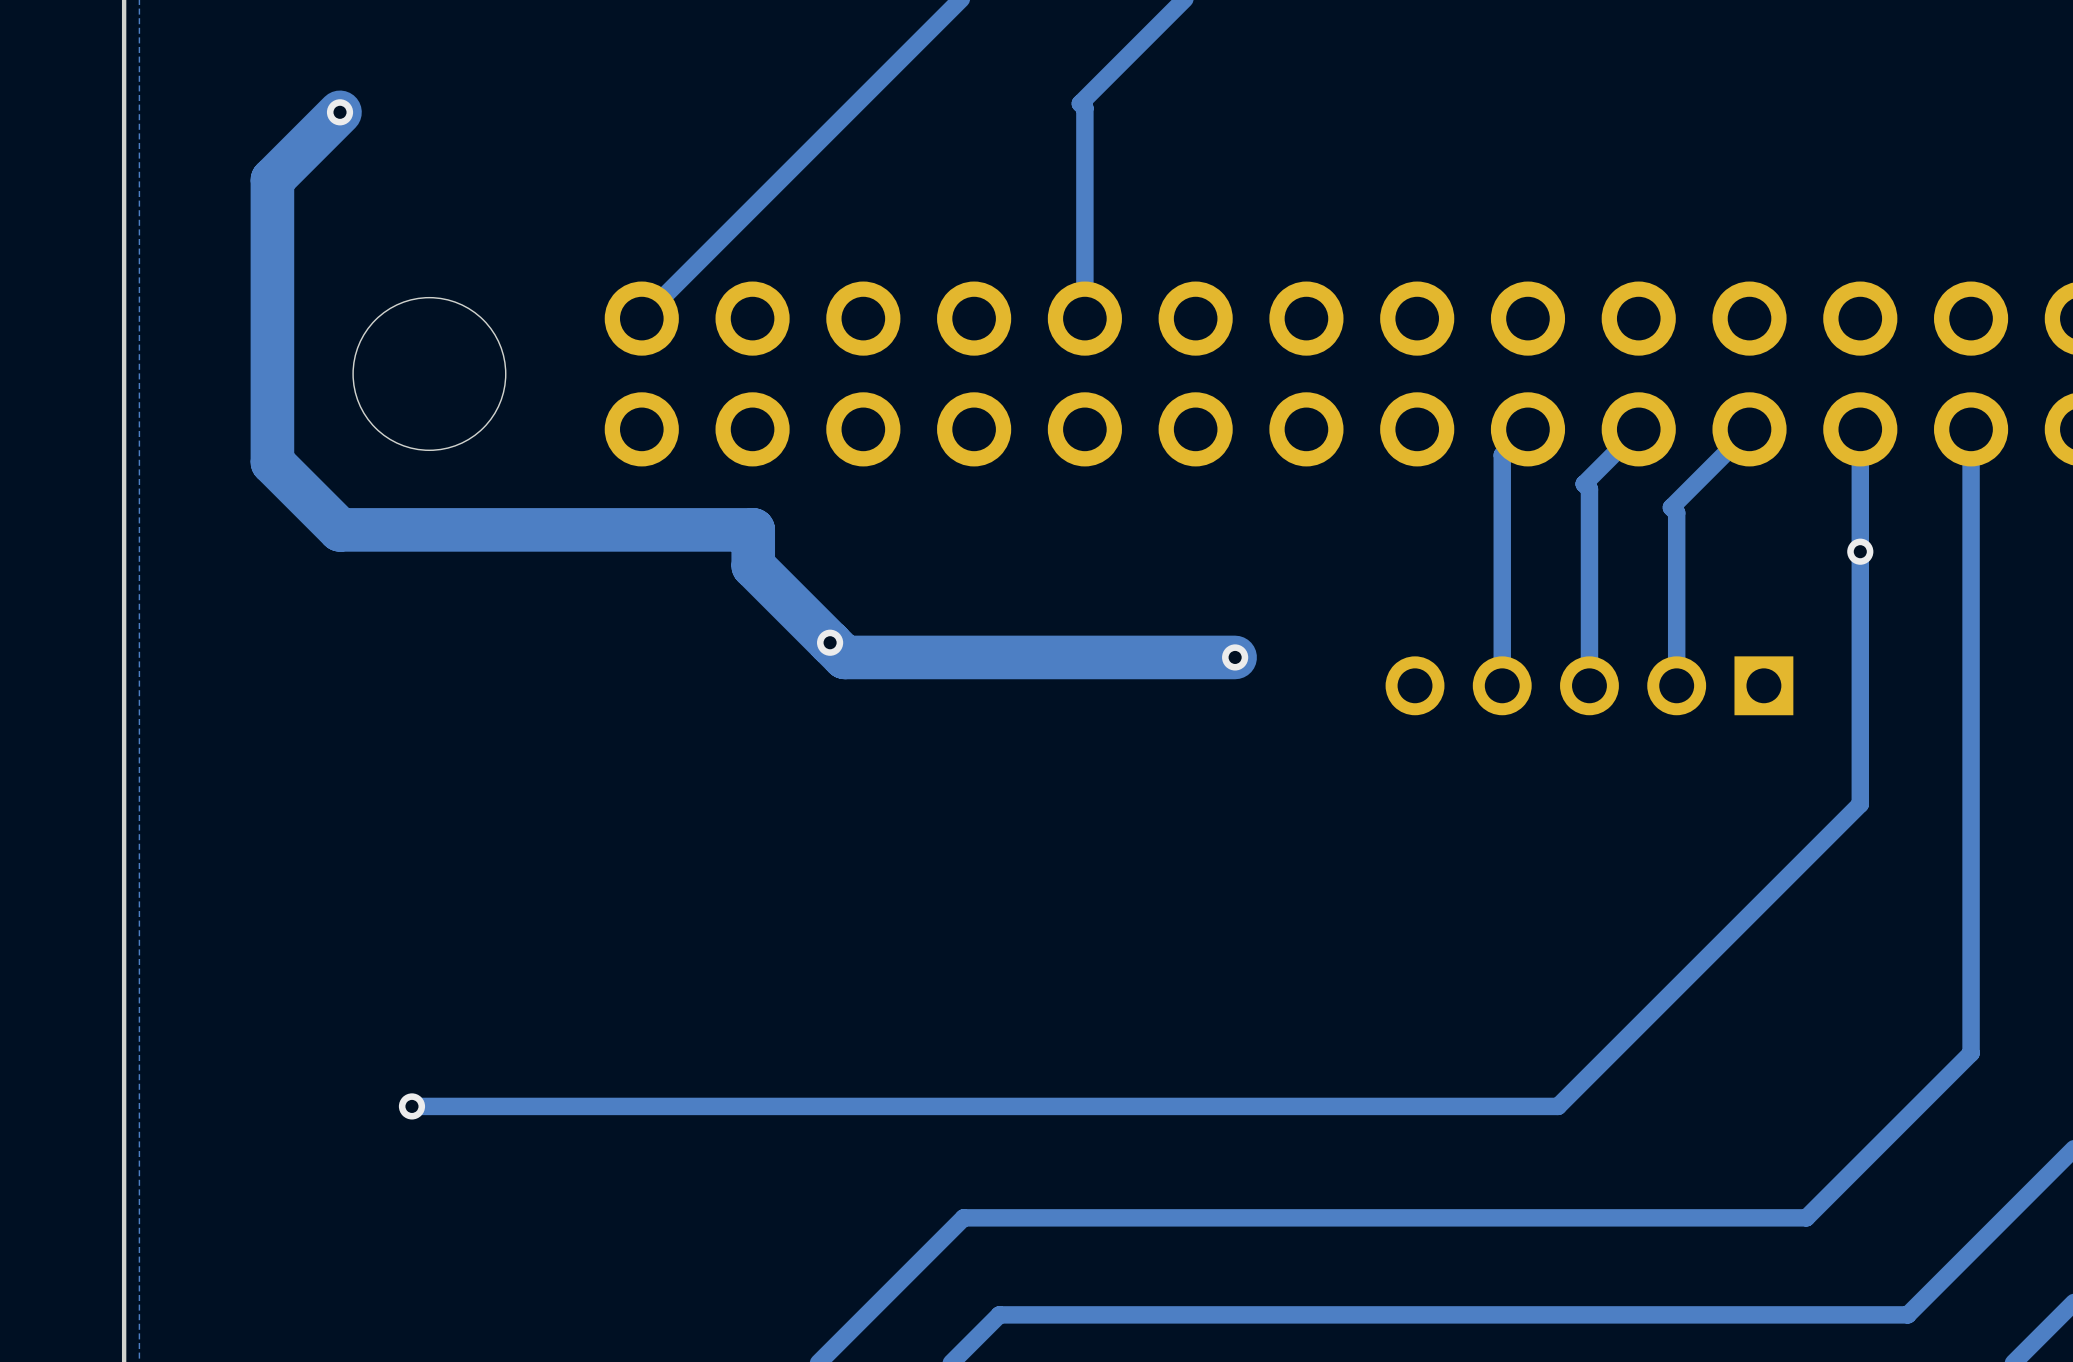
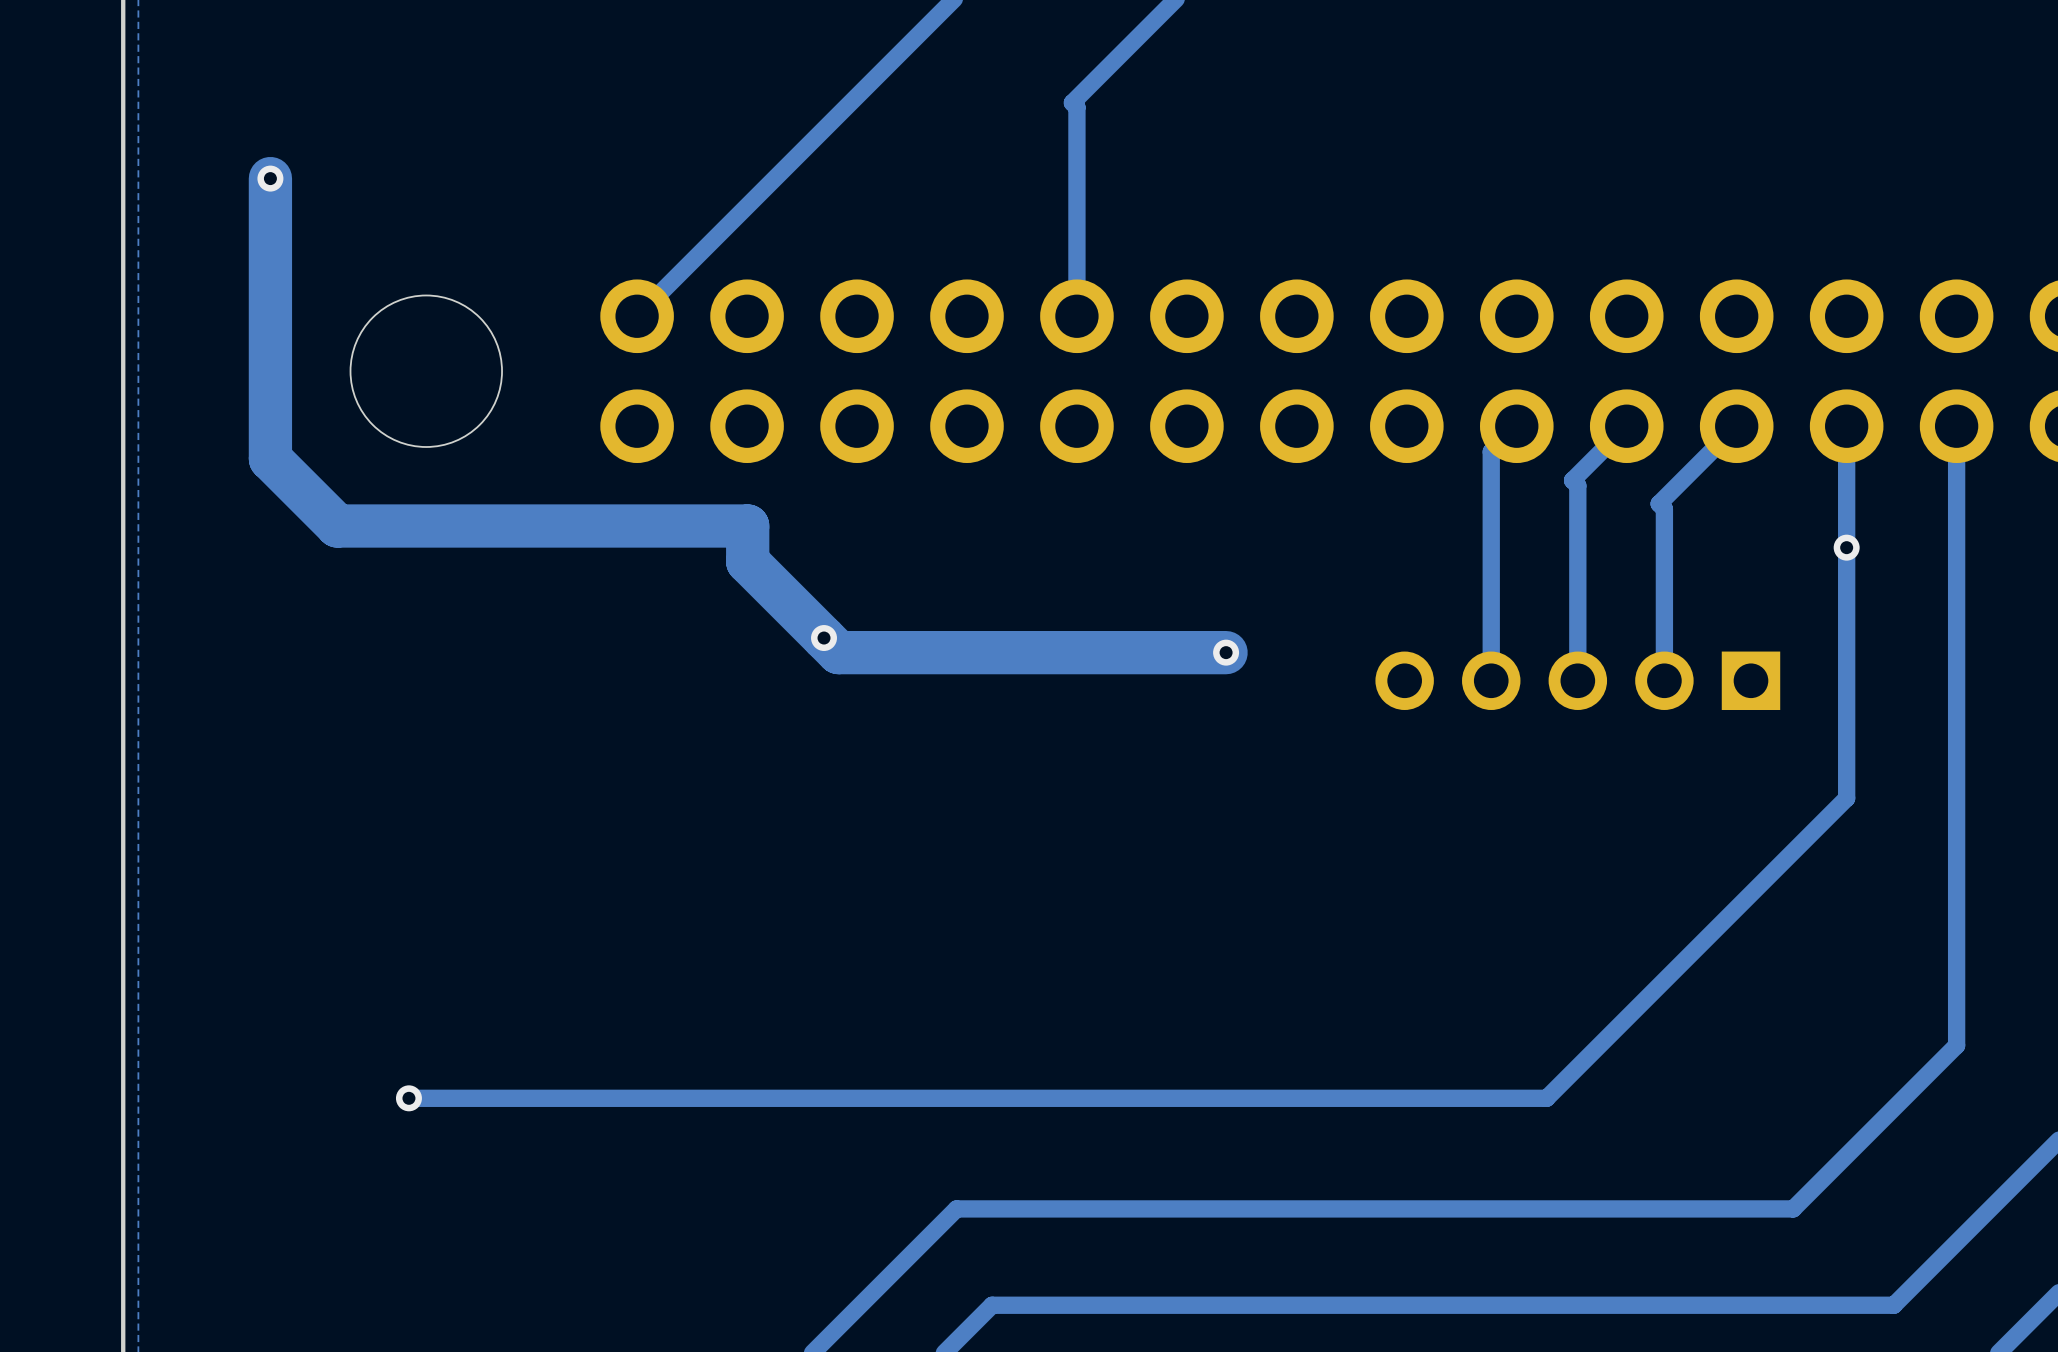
track: (340, 112) (272, 179) -> none
via position: (340, 112) -> (270, 178)

